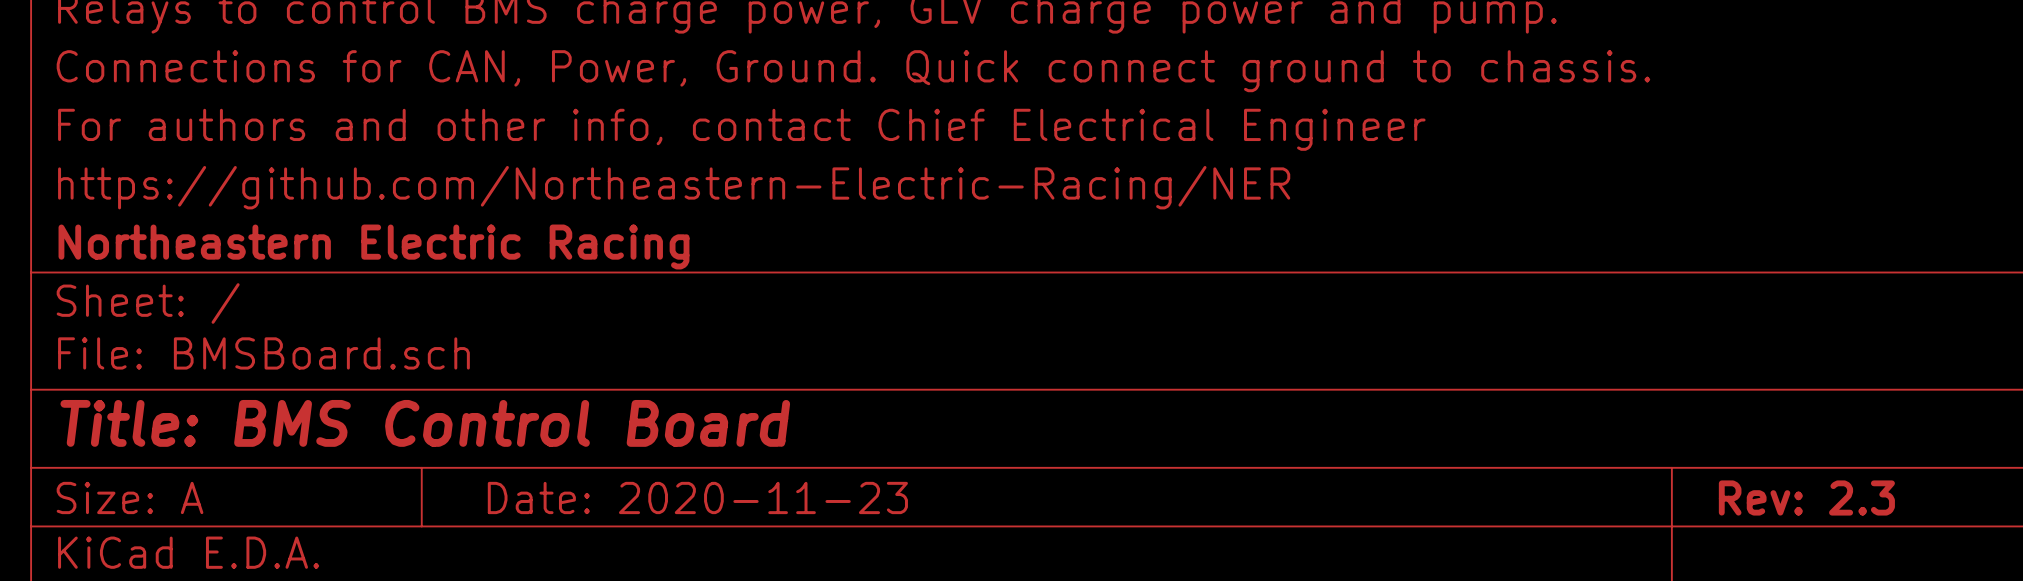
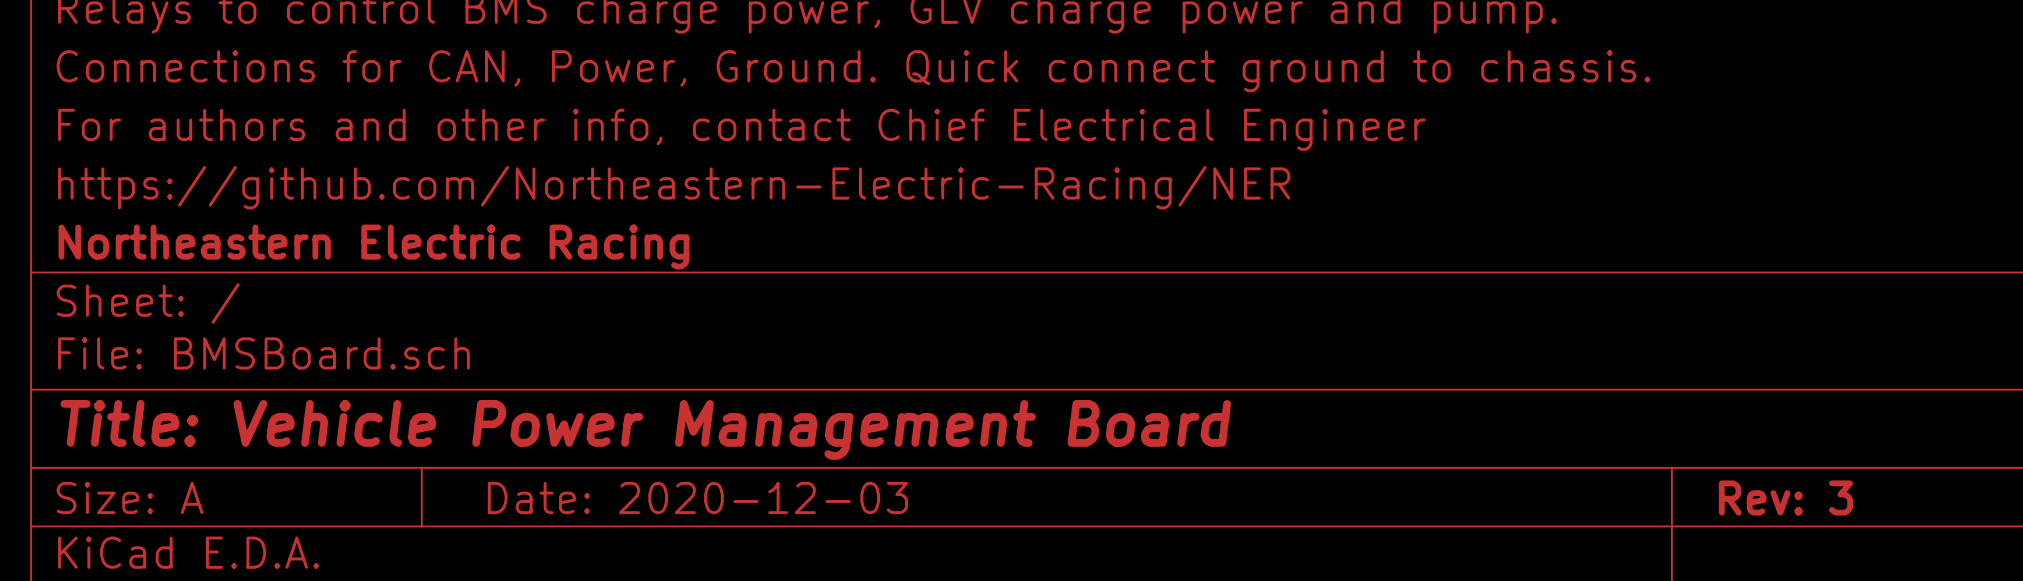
title block: Title: BMS Control Board (425, 423) -> Title: Vehicle Power Management Board (645, 429)
title block: Date: 2020-11-23 (697, 497) -> Date: 2020-12-03 (697, 497)
title block: Rev: 2.3 (1806, 497) -> Rev: 3 (1785, 497)

